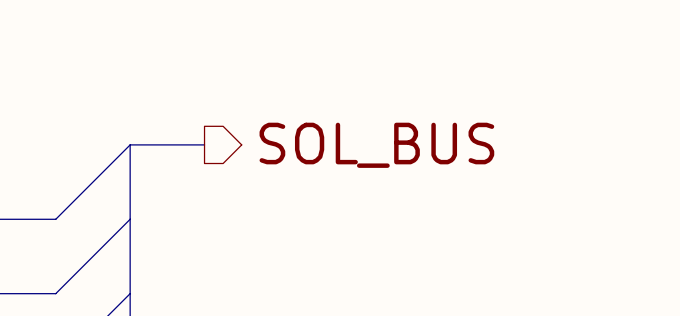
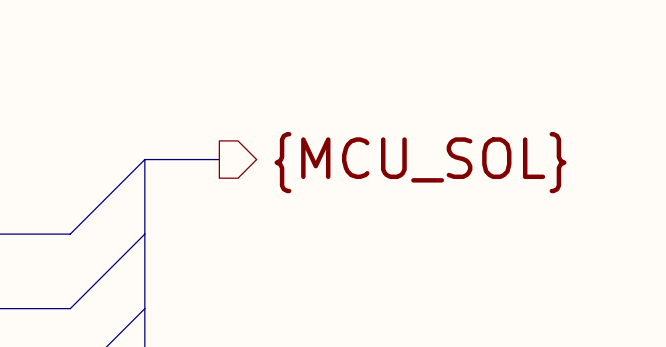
hierarchical label: SOL_BUS (376, 145) -> {MCU_SOL} (420, 162)

